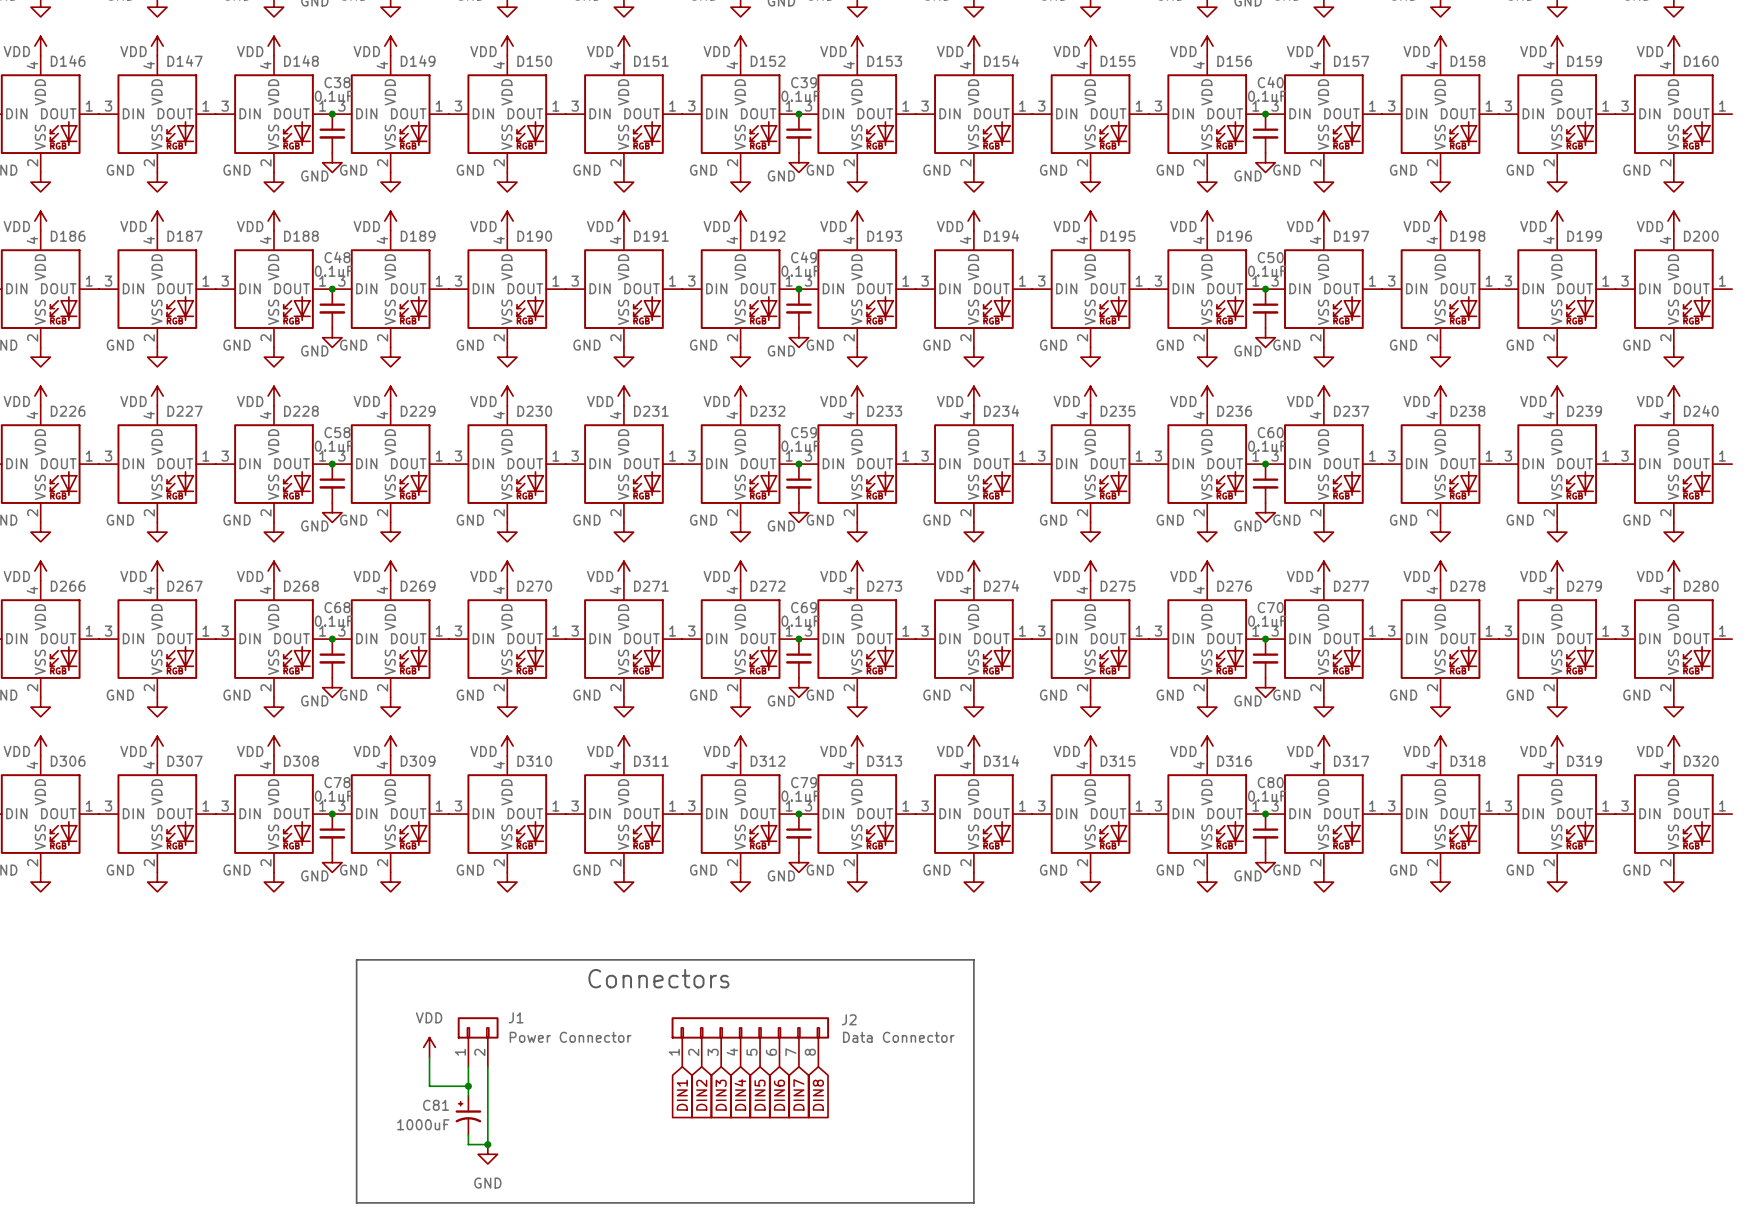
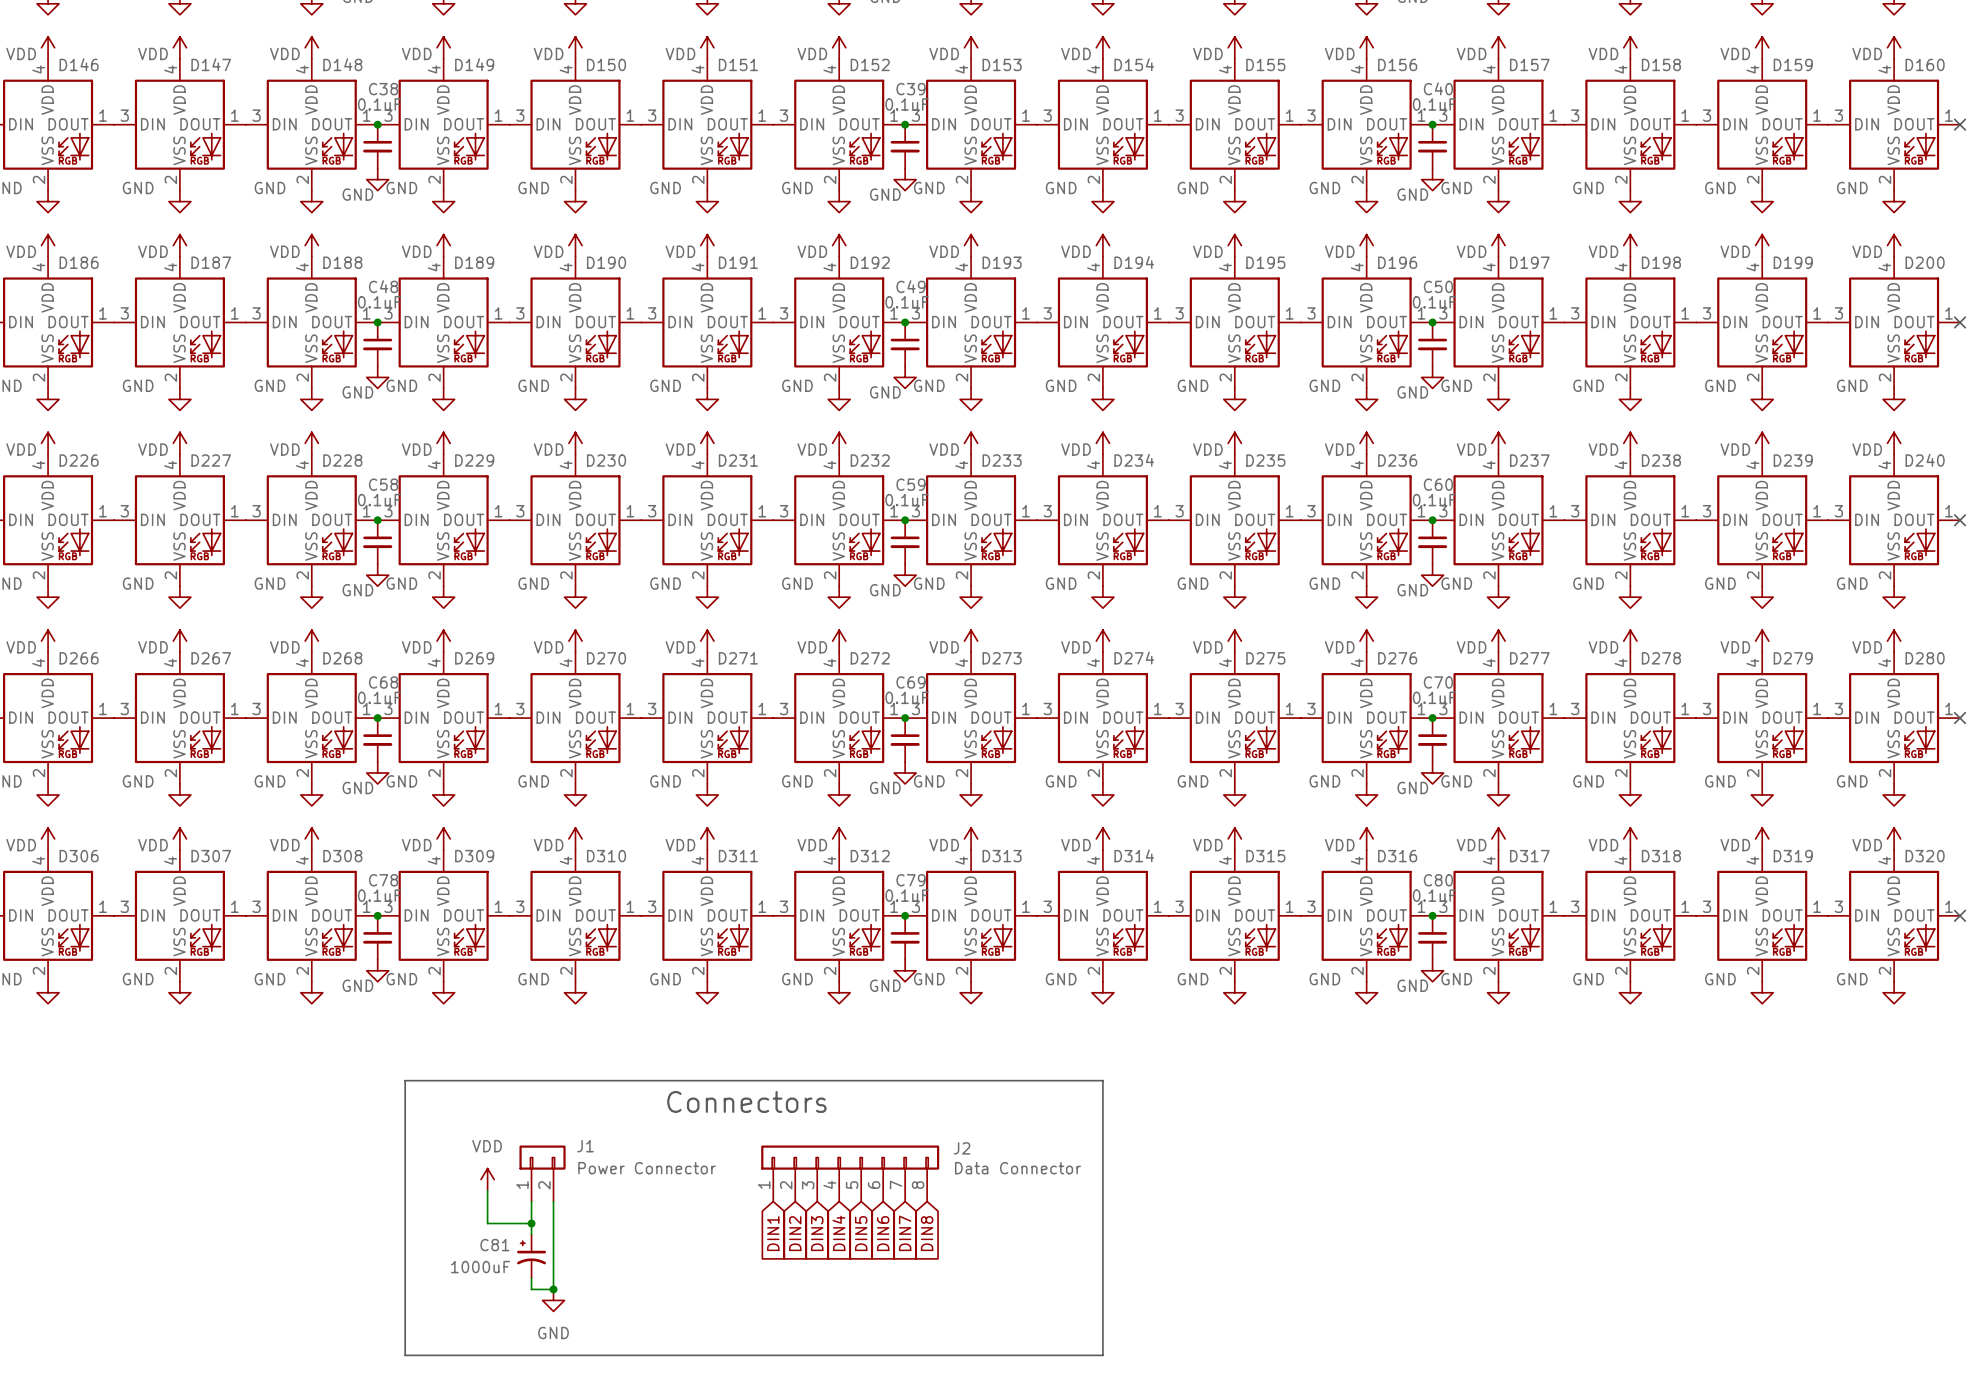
no-connect mark: none -> (1960, 124)
no-connect mark: none -> (1960, 322)
no-connect mark: none -> (1960, 520)
no-connect mark: none -> (1960, 718)
no-connect mark: none -> (1960, 915)

